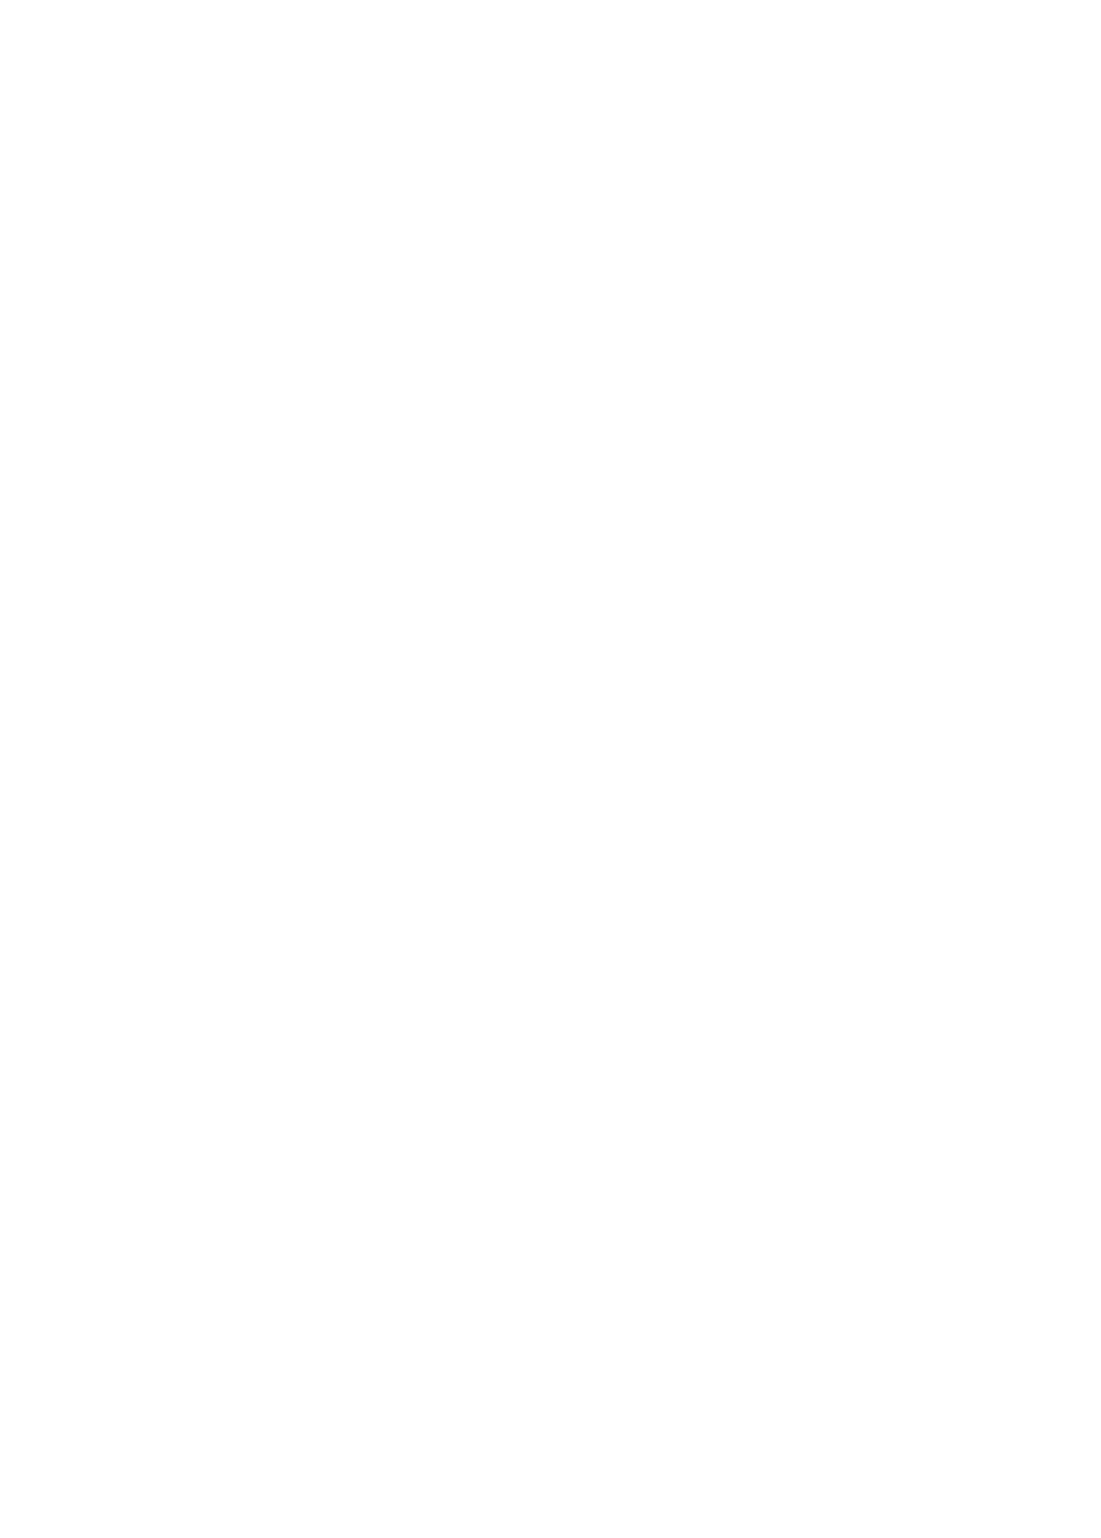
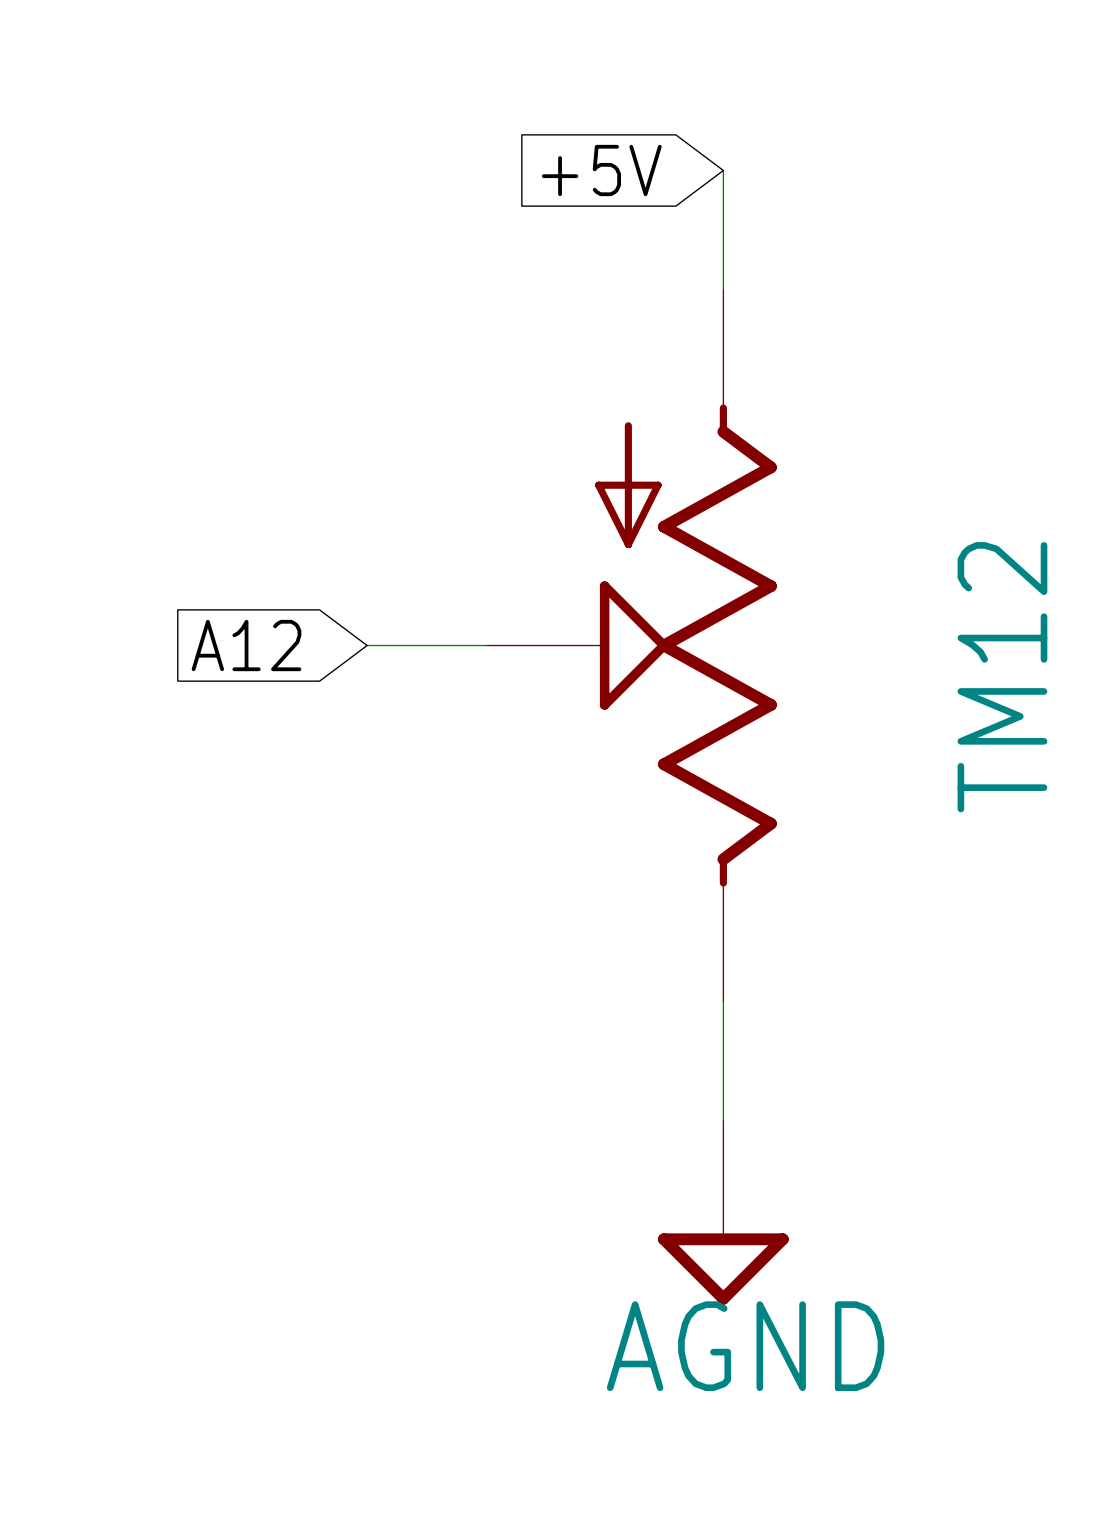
global label: none -> +5V (601, 170)
wire: none -> (723, 170) (723, 289)
global label: none -> A12 (246, 645)
wire: none -> (367, 645) (485, 645)
TM12: none -> (631, 645)
wire: none -> (723, 1001) (723, 1120)
power symbol: none -> AGND (723, 1212)

